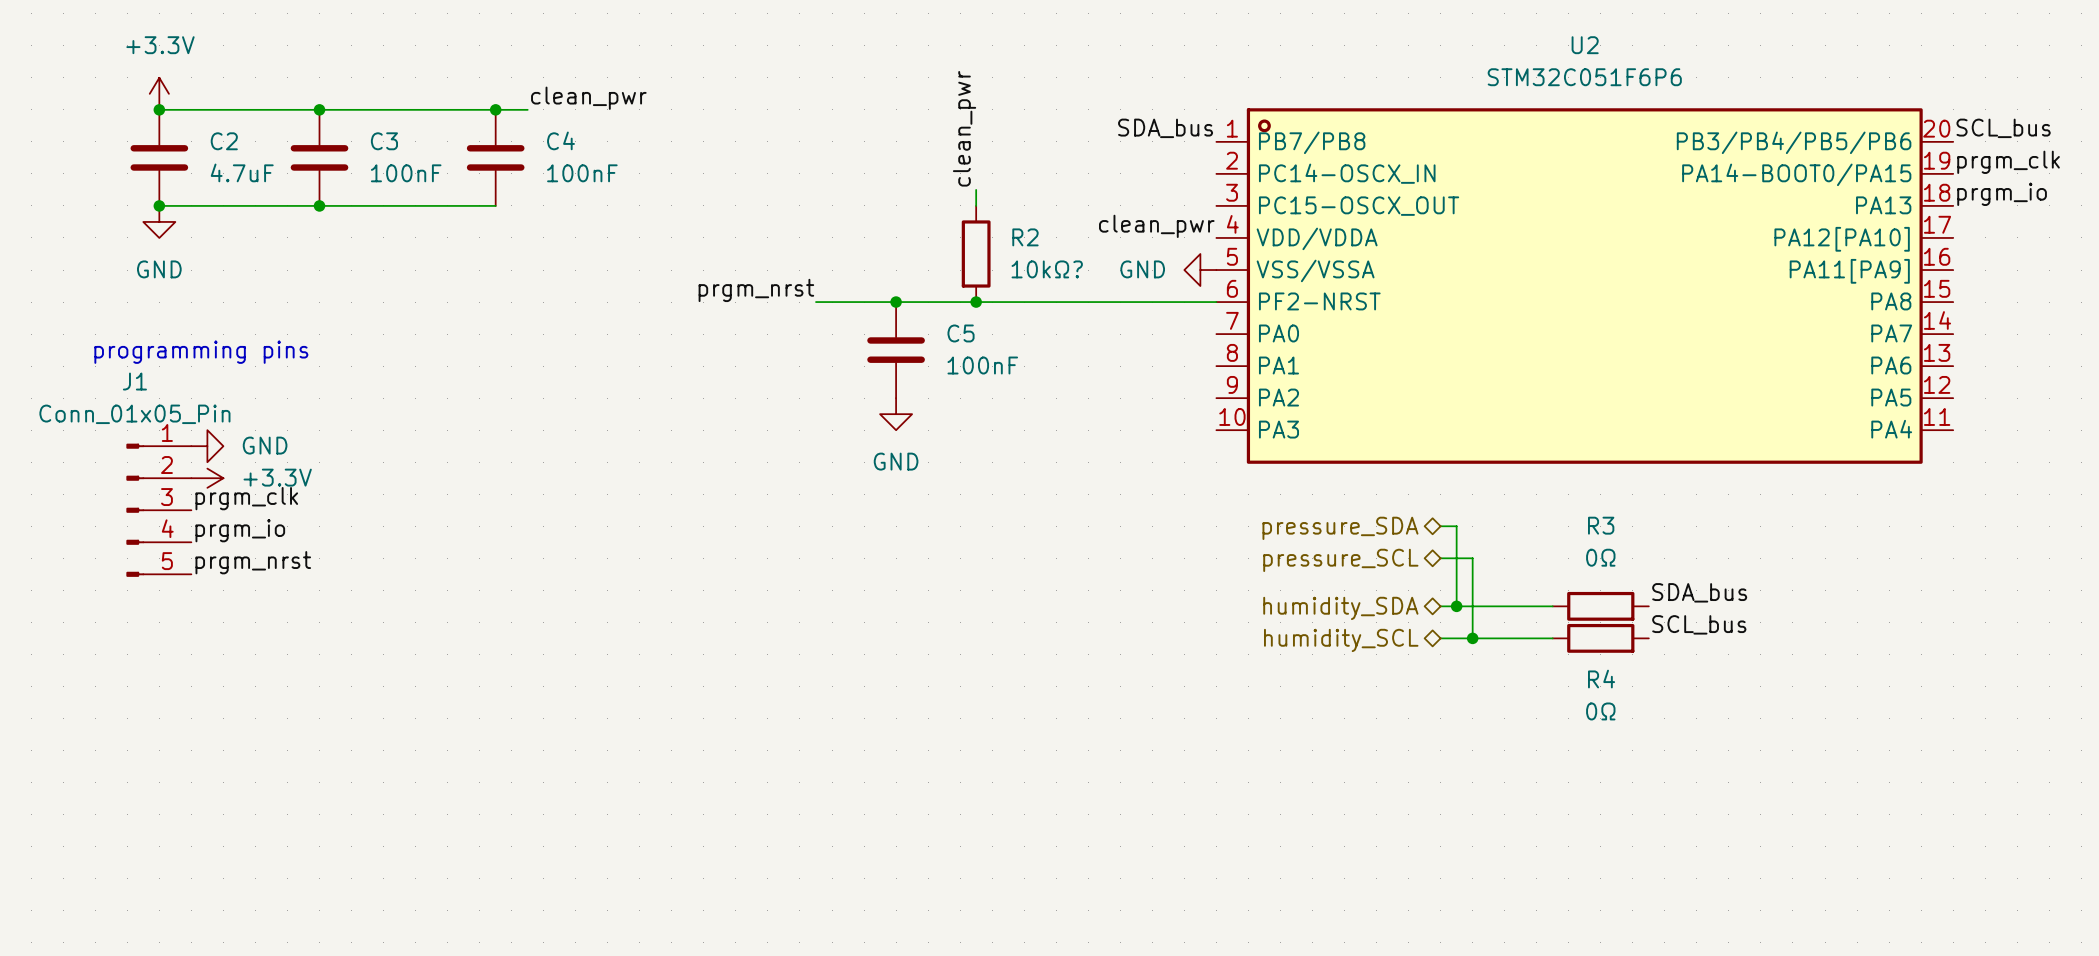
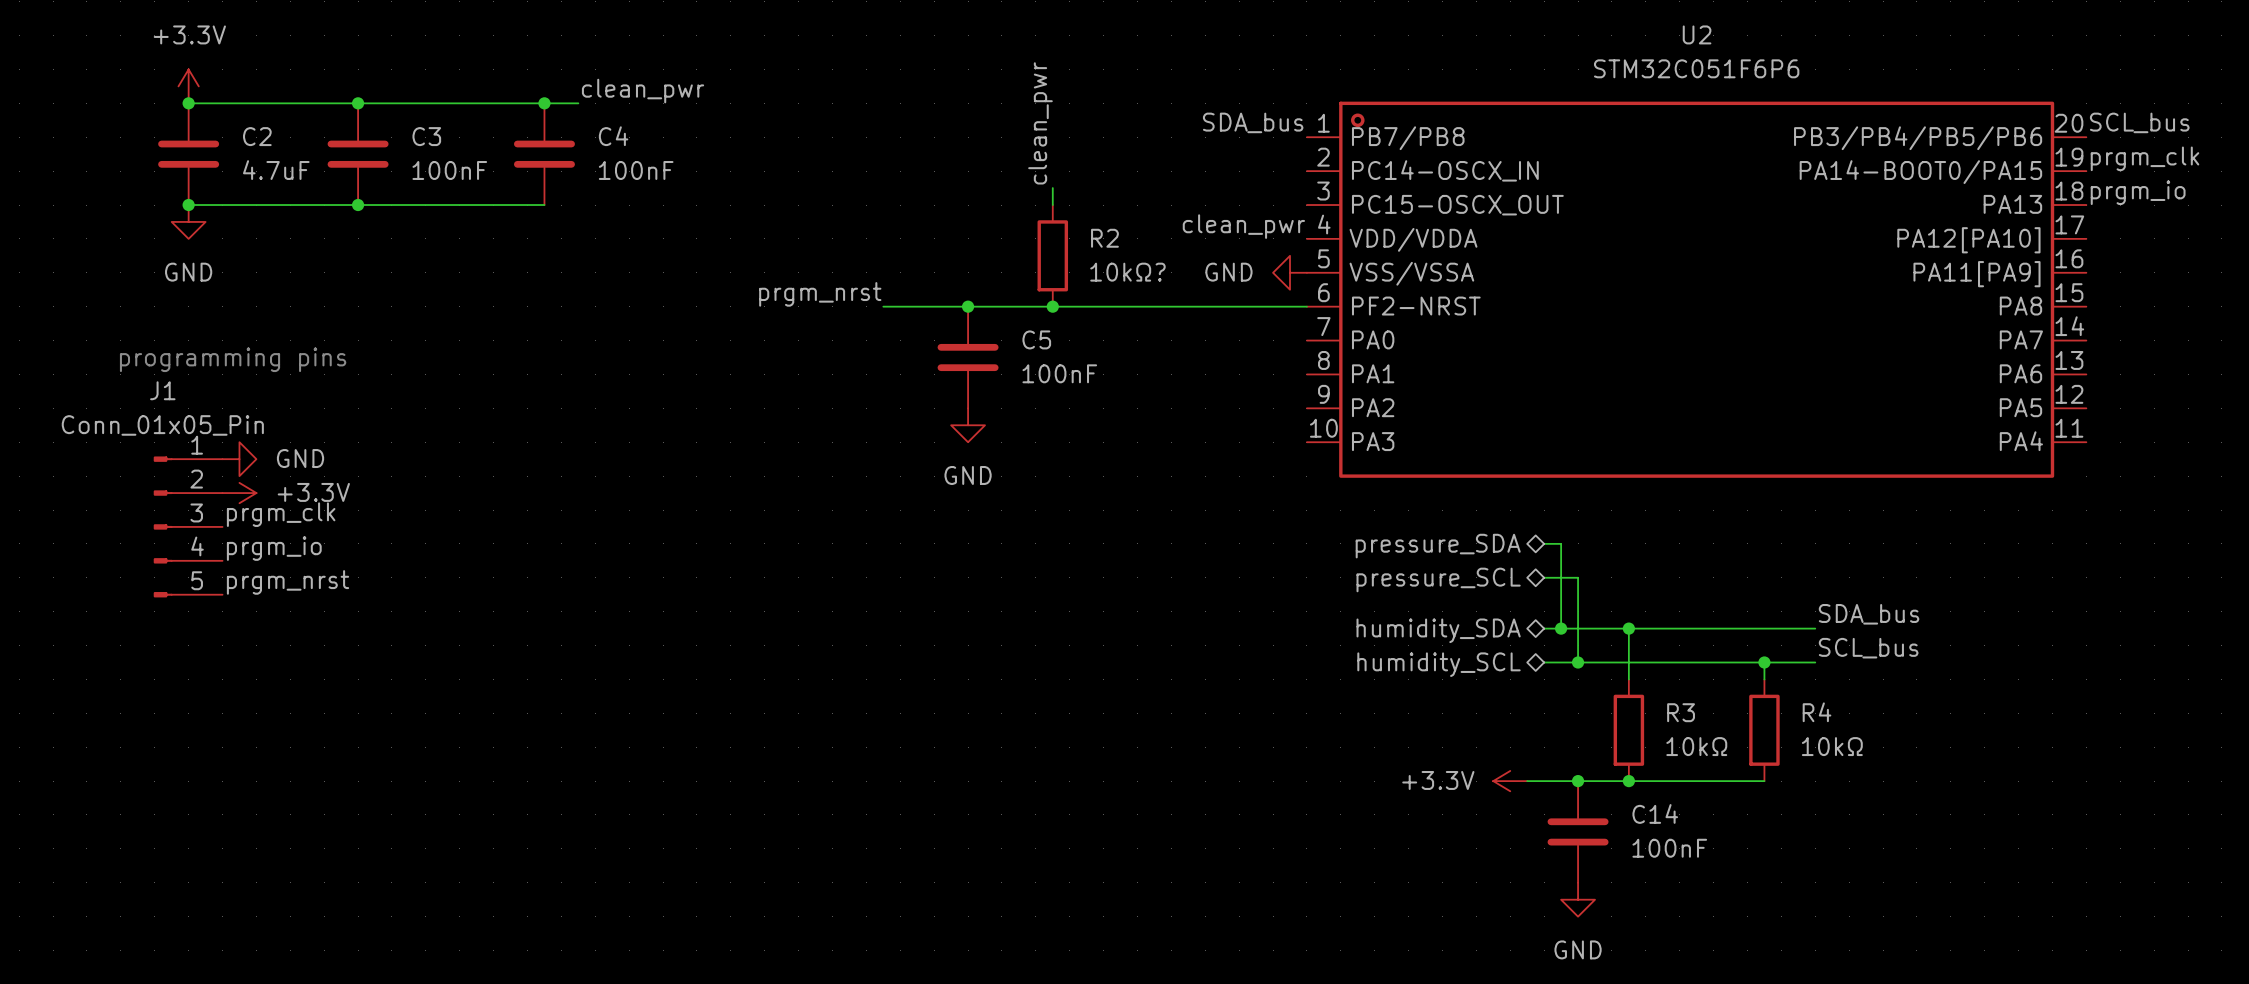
R3 name position: R3 (1601, 525) -> R3 (1681, 712)
R3 value: 0Ω (1600, 557) -> 10kΩ (1696, 746)
label position: SDA_bus (1699, 592) -> SDA_bus (1869, 614)
wire: none -> (1628, 628) (1628, 679)
junction: none -> (1628, 628)
wire: none -> (1662, 628) (1815, 628)
R3 rotation: 0° (1600, 606) -> 90° clockwise (1628, 730)
R3 position: (1600, 606) -> (1628, 730)
label position: SCL_bus (1699, 624) -> SCL_bus (1868, 648)
wire: none -> (1662, 662) (1815, 662)
R4 rotation: 0° (1600, 638) -> 90° clockwise (1764, 730)
R4 position: (1600, 638) -> (1764, 730)
wire: none -> (1764, 662) (1764, 679)
junction: none -> (1764, 662)
R4 name position: R4 (1601, 679) -> R4 (1817, 712)
R4 value: 0Ω (1600, 711) -> 10kΩ (1832, 746)
power symbol: none -> +3.3V (1510, 781)
wire: none -> (1527, 781) (1764, 781)
junction: none -> (1578, 781)
junction: none -> (1628, 781)
C14: none -> 100nF (1578, 831)
power symbol: none -> GND (1578, 899)

